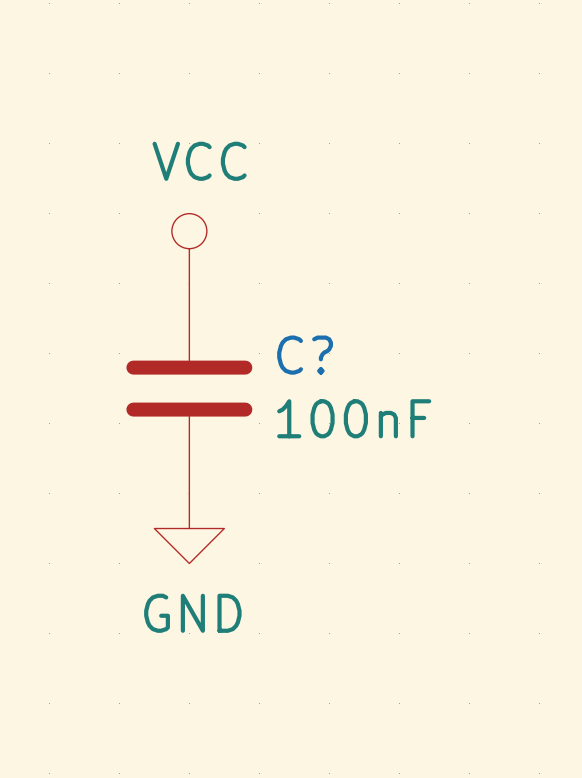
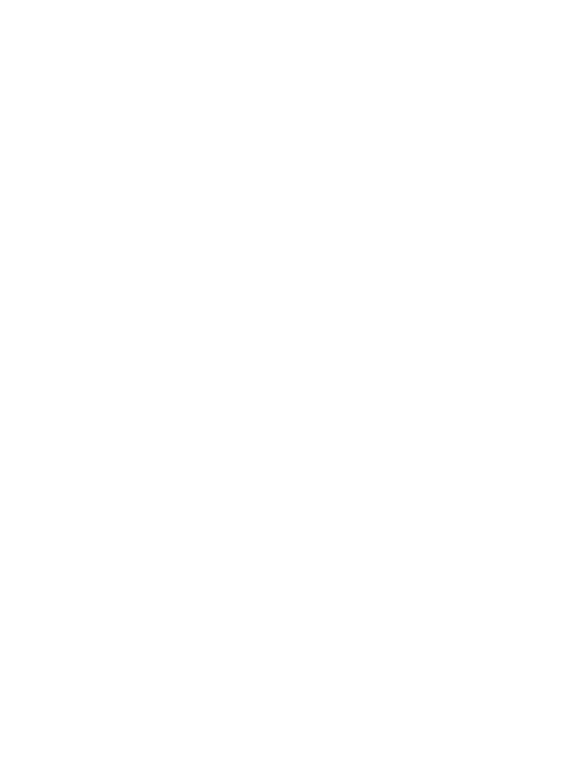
power symbol: VCC (189, 248) -> none
C?: 100nF (189, 388) -> none
power symbol: GND (189, 528) -> none

